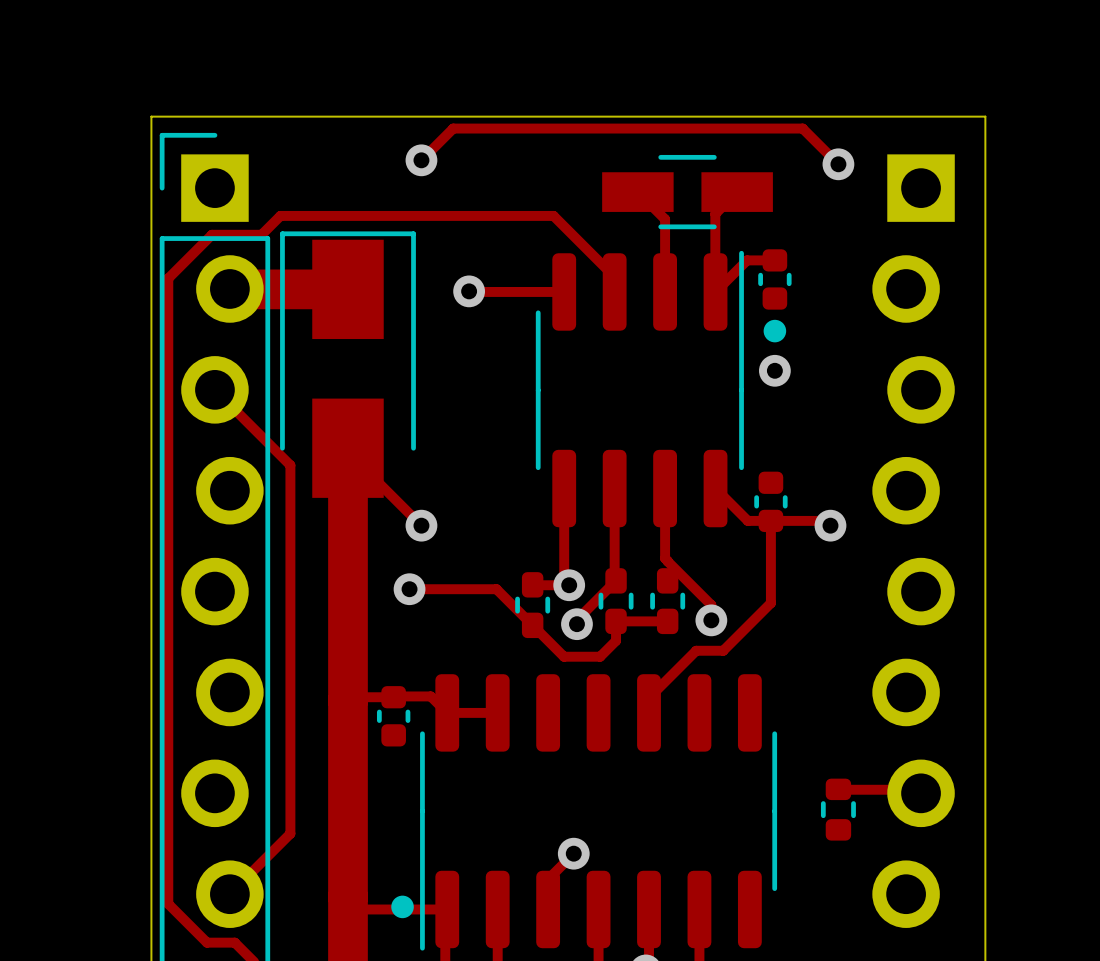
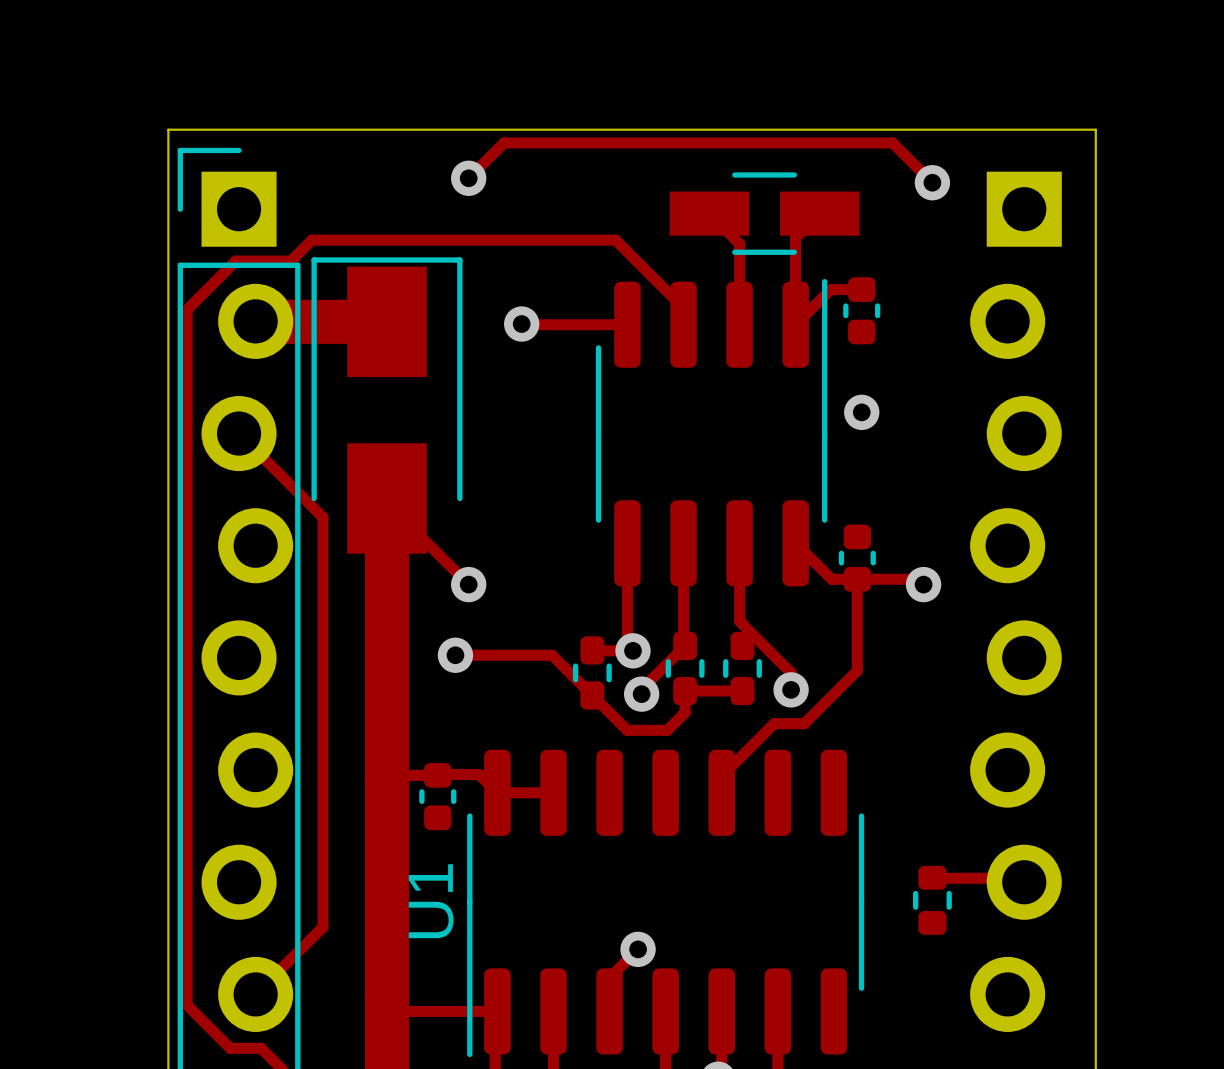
drawing: [763, 319, 787, 343] -> none
U1 name: none -> U1 (431, 901)
drawing: [391, 895, 414, 919] -> none

